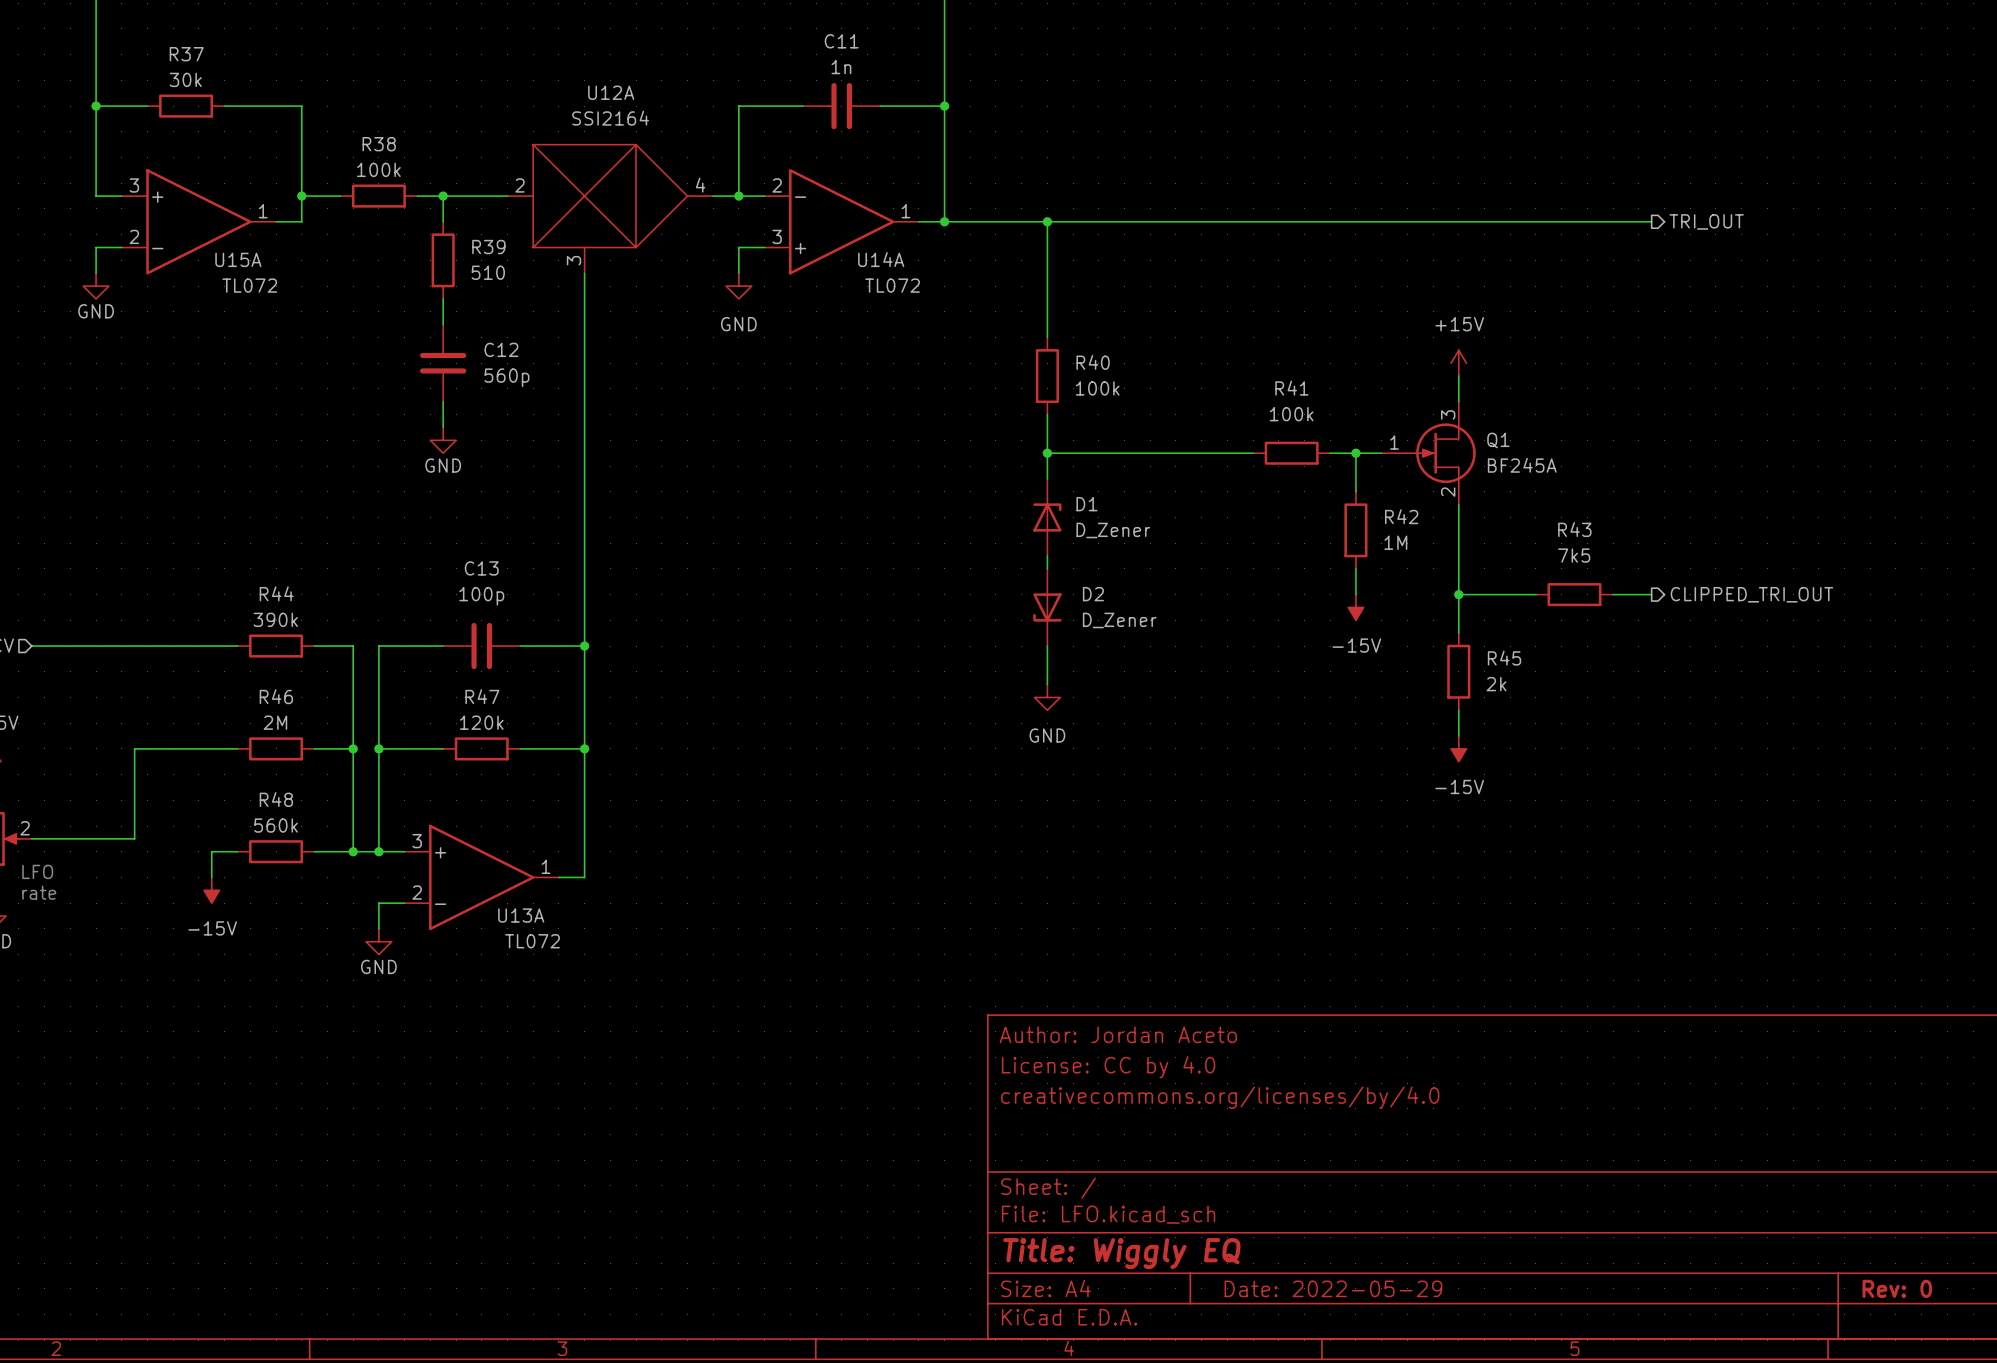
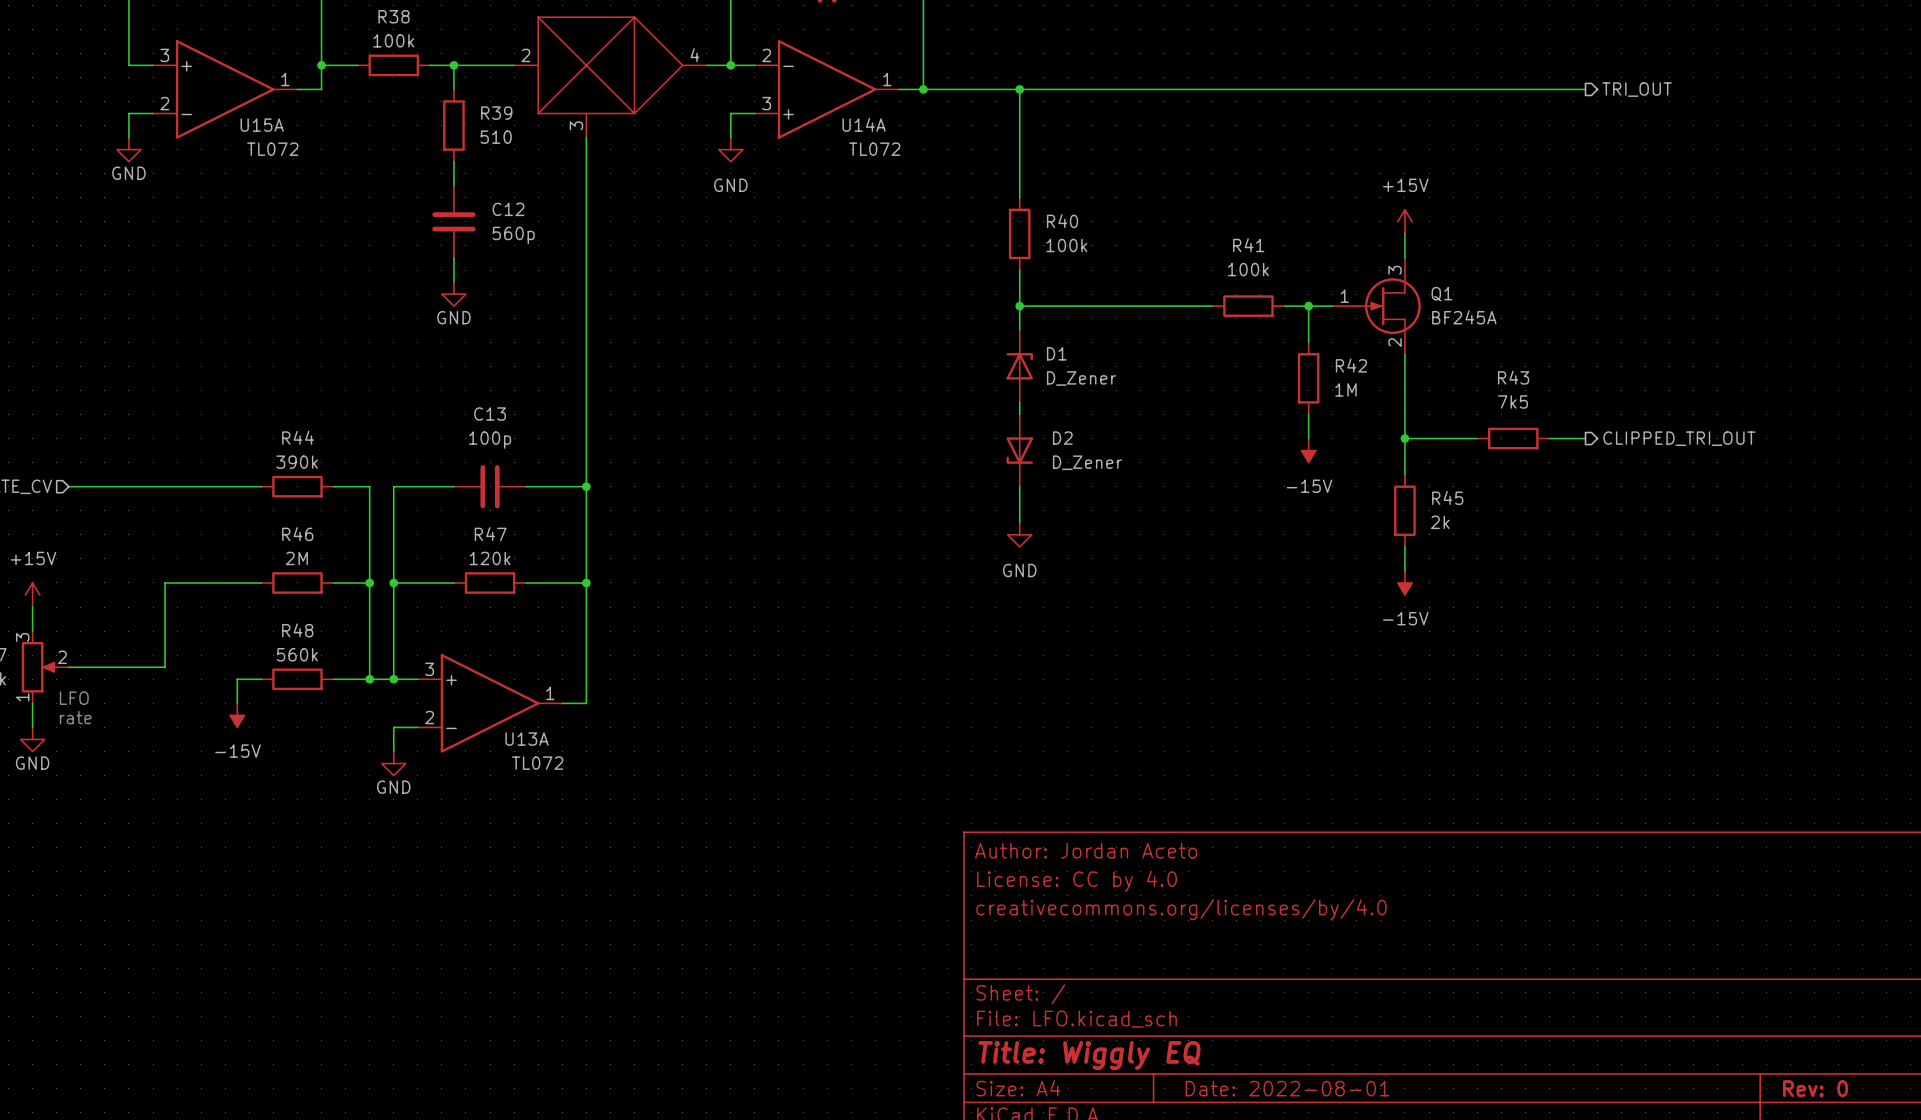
title block: Date: 2022-05-29 (1333, 1288) -> Date: 2022-08-01 (1287, 1088)

